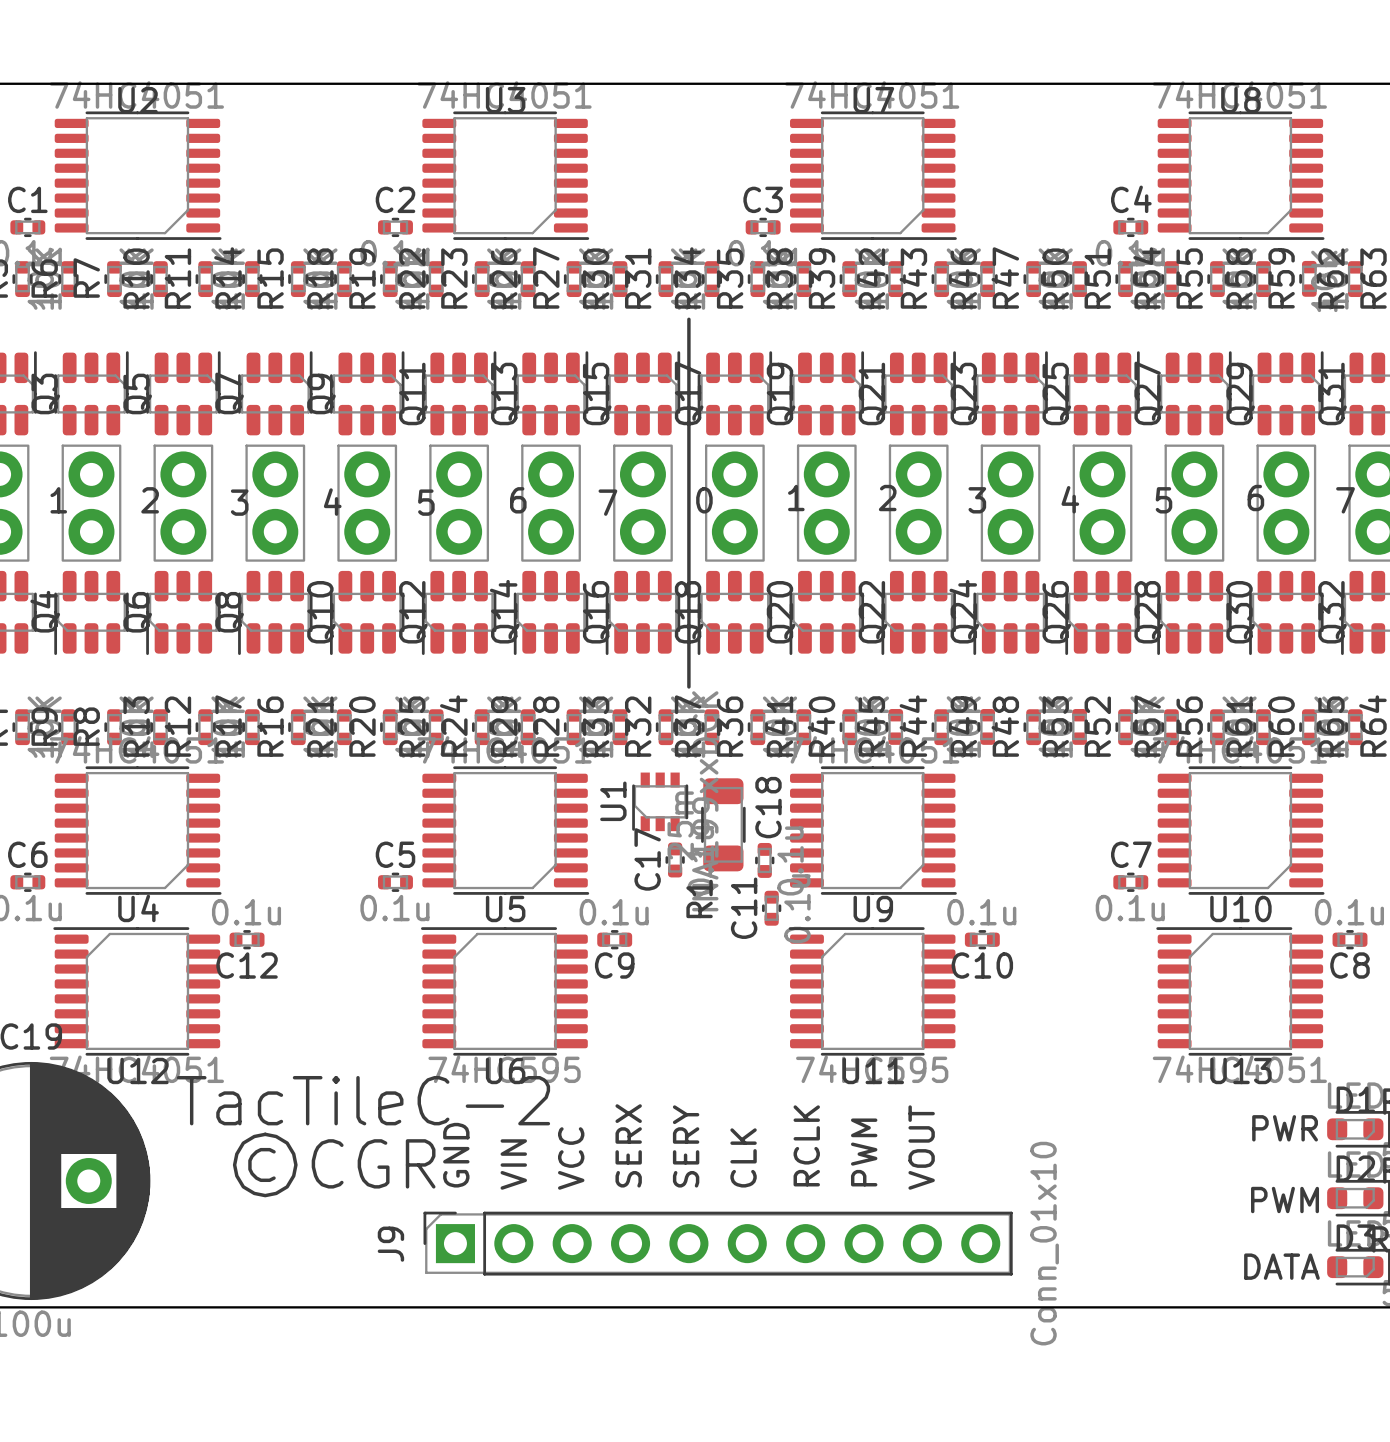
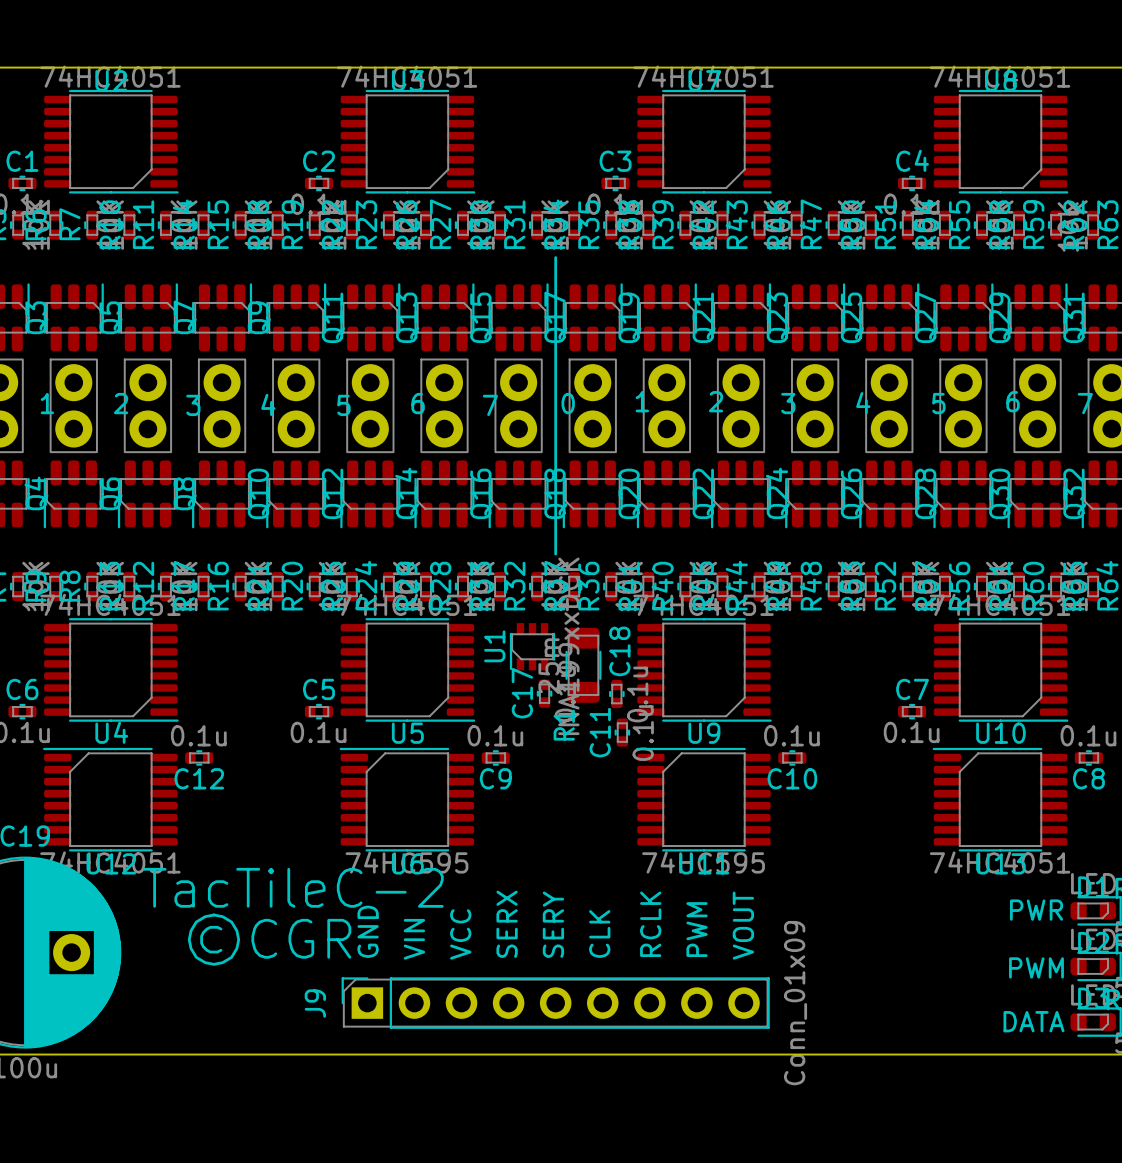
J9 footprint: [423, 1211, 1013, 1276] -> [341, 977, 770, 1029]
J9 value: Conn_01x10 (1044, 1243) -> Conn_01x09 (795, 1003)

